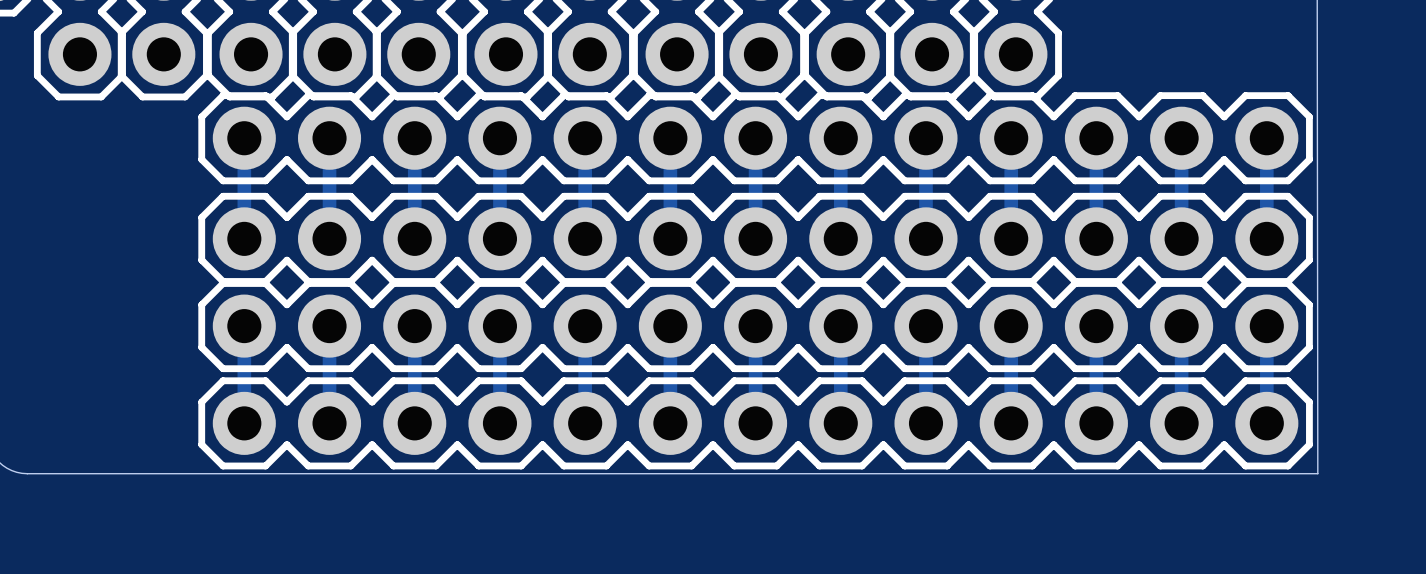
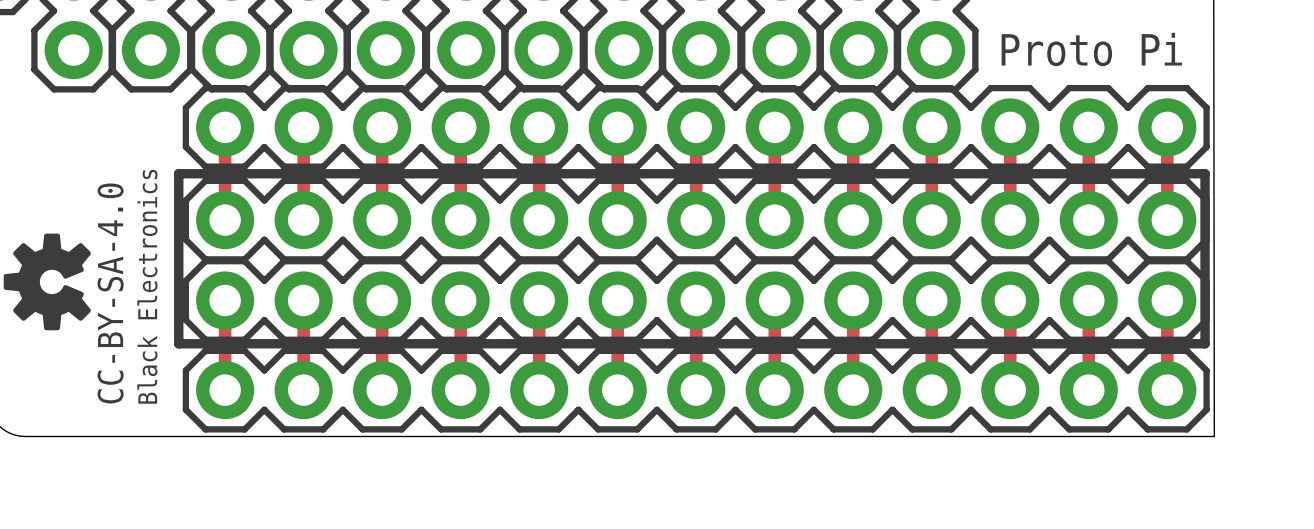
text: none -> Proto Pi (1091, 49)
line: none -> (178, 173) (178, 343) (1205, 343) (1205, 173) (178, 173)
drawing: none -> [3, 233, 91, 331]
text: none -> CC-BY-SA-4.0 (110, 293)
text: none -> Black Electronics (147, 286)

